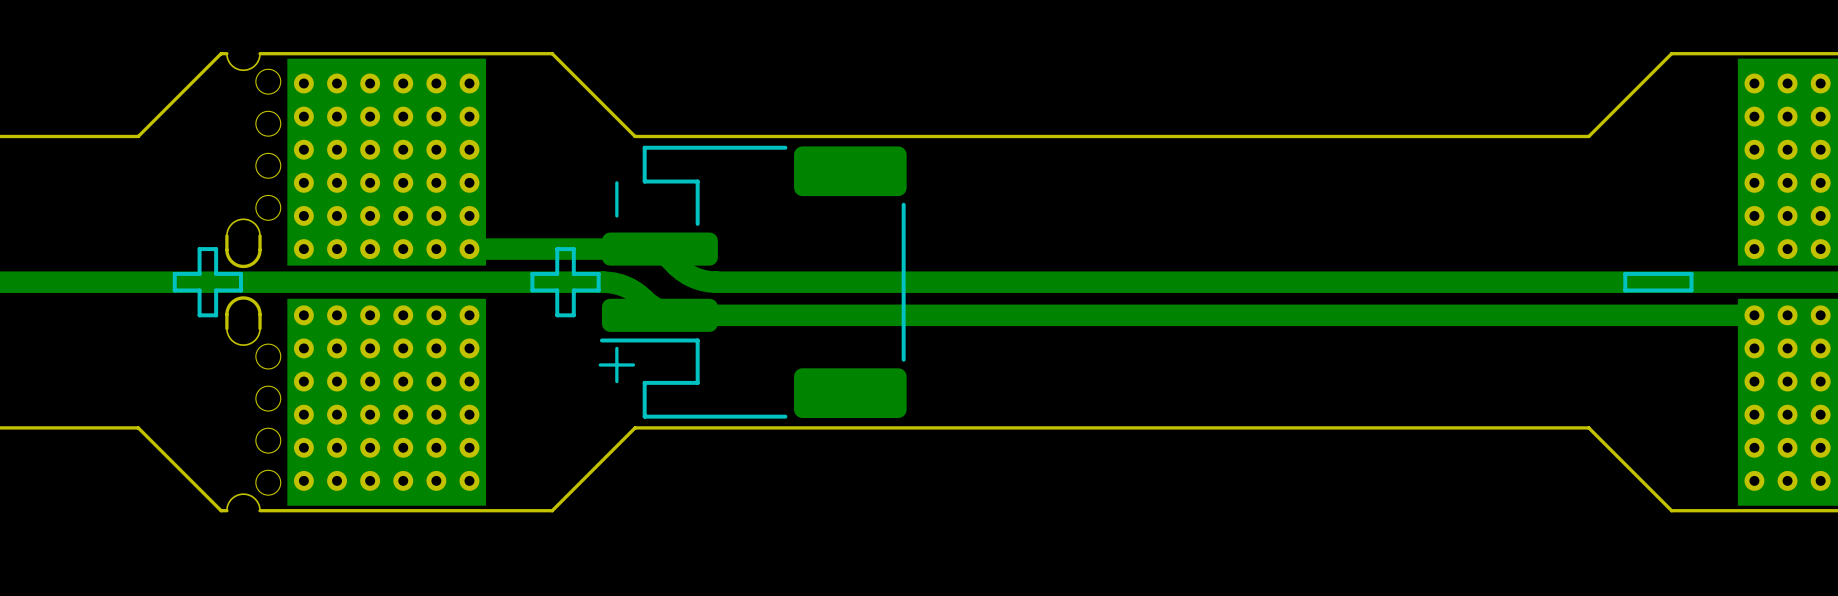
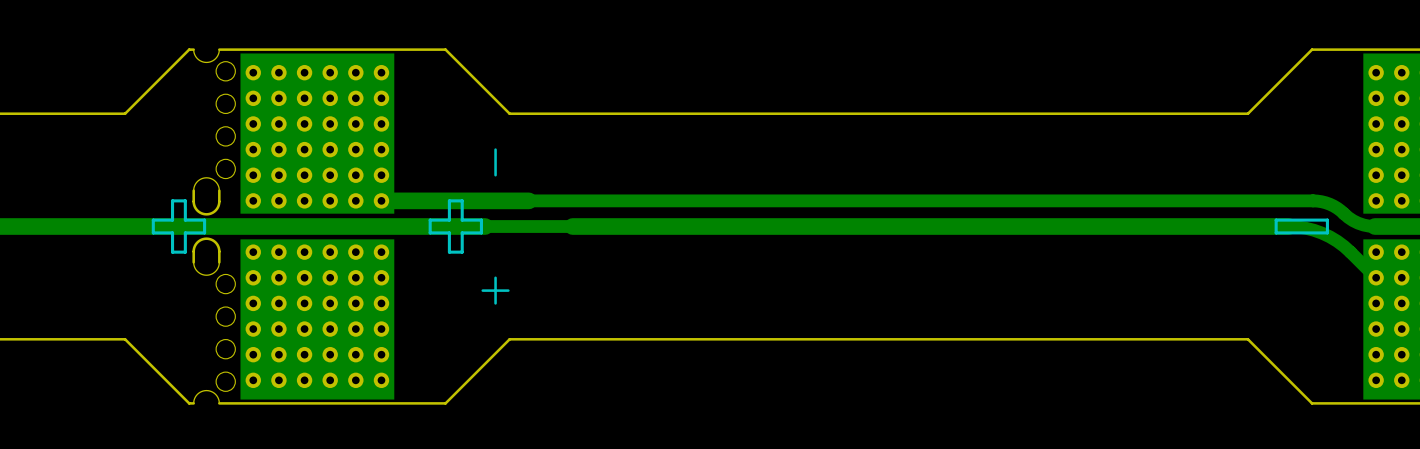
track: (659, 249) (688, 274) (701, 280) (716, 282) -> (485, 226) (572, 226)
track: none -> (528, 200) (1313, 200) (1333, 206) (1358, 223) (1374, 226)
track: (603, 282) (625, 286) (655, 307) (668, 313) (683, 315) (1754, 315) -> none
part: (753, 282) -> none
track: (1752, 282) (1641, 282) -> (1376, 277) (1344, 246) (1329, 236) (1314, 230) (1288, 226)

